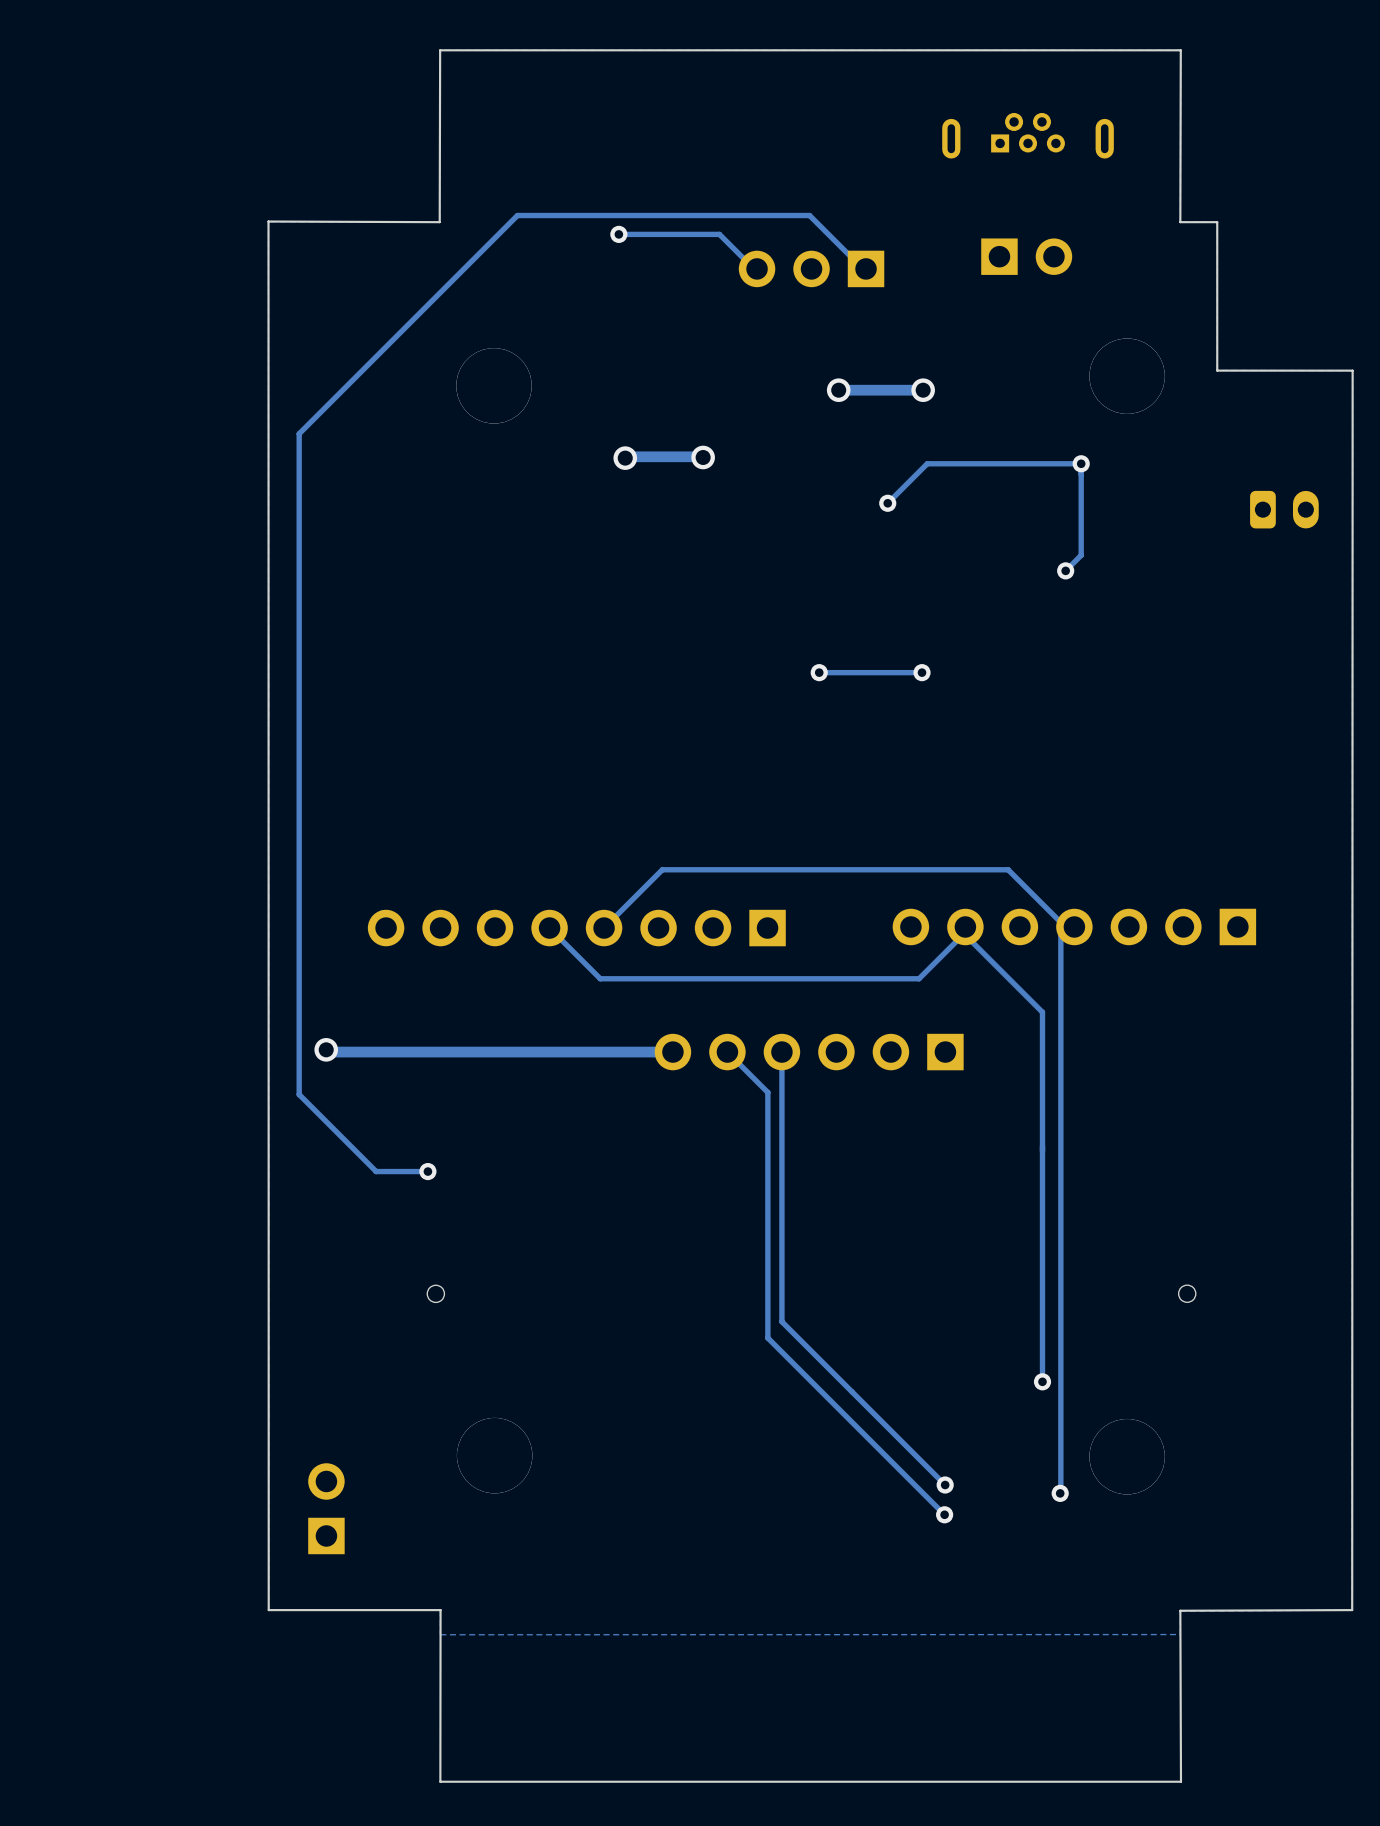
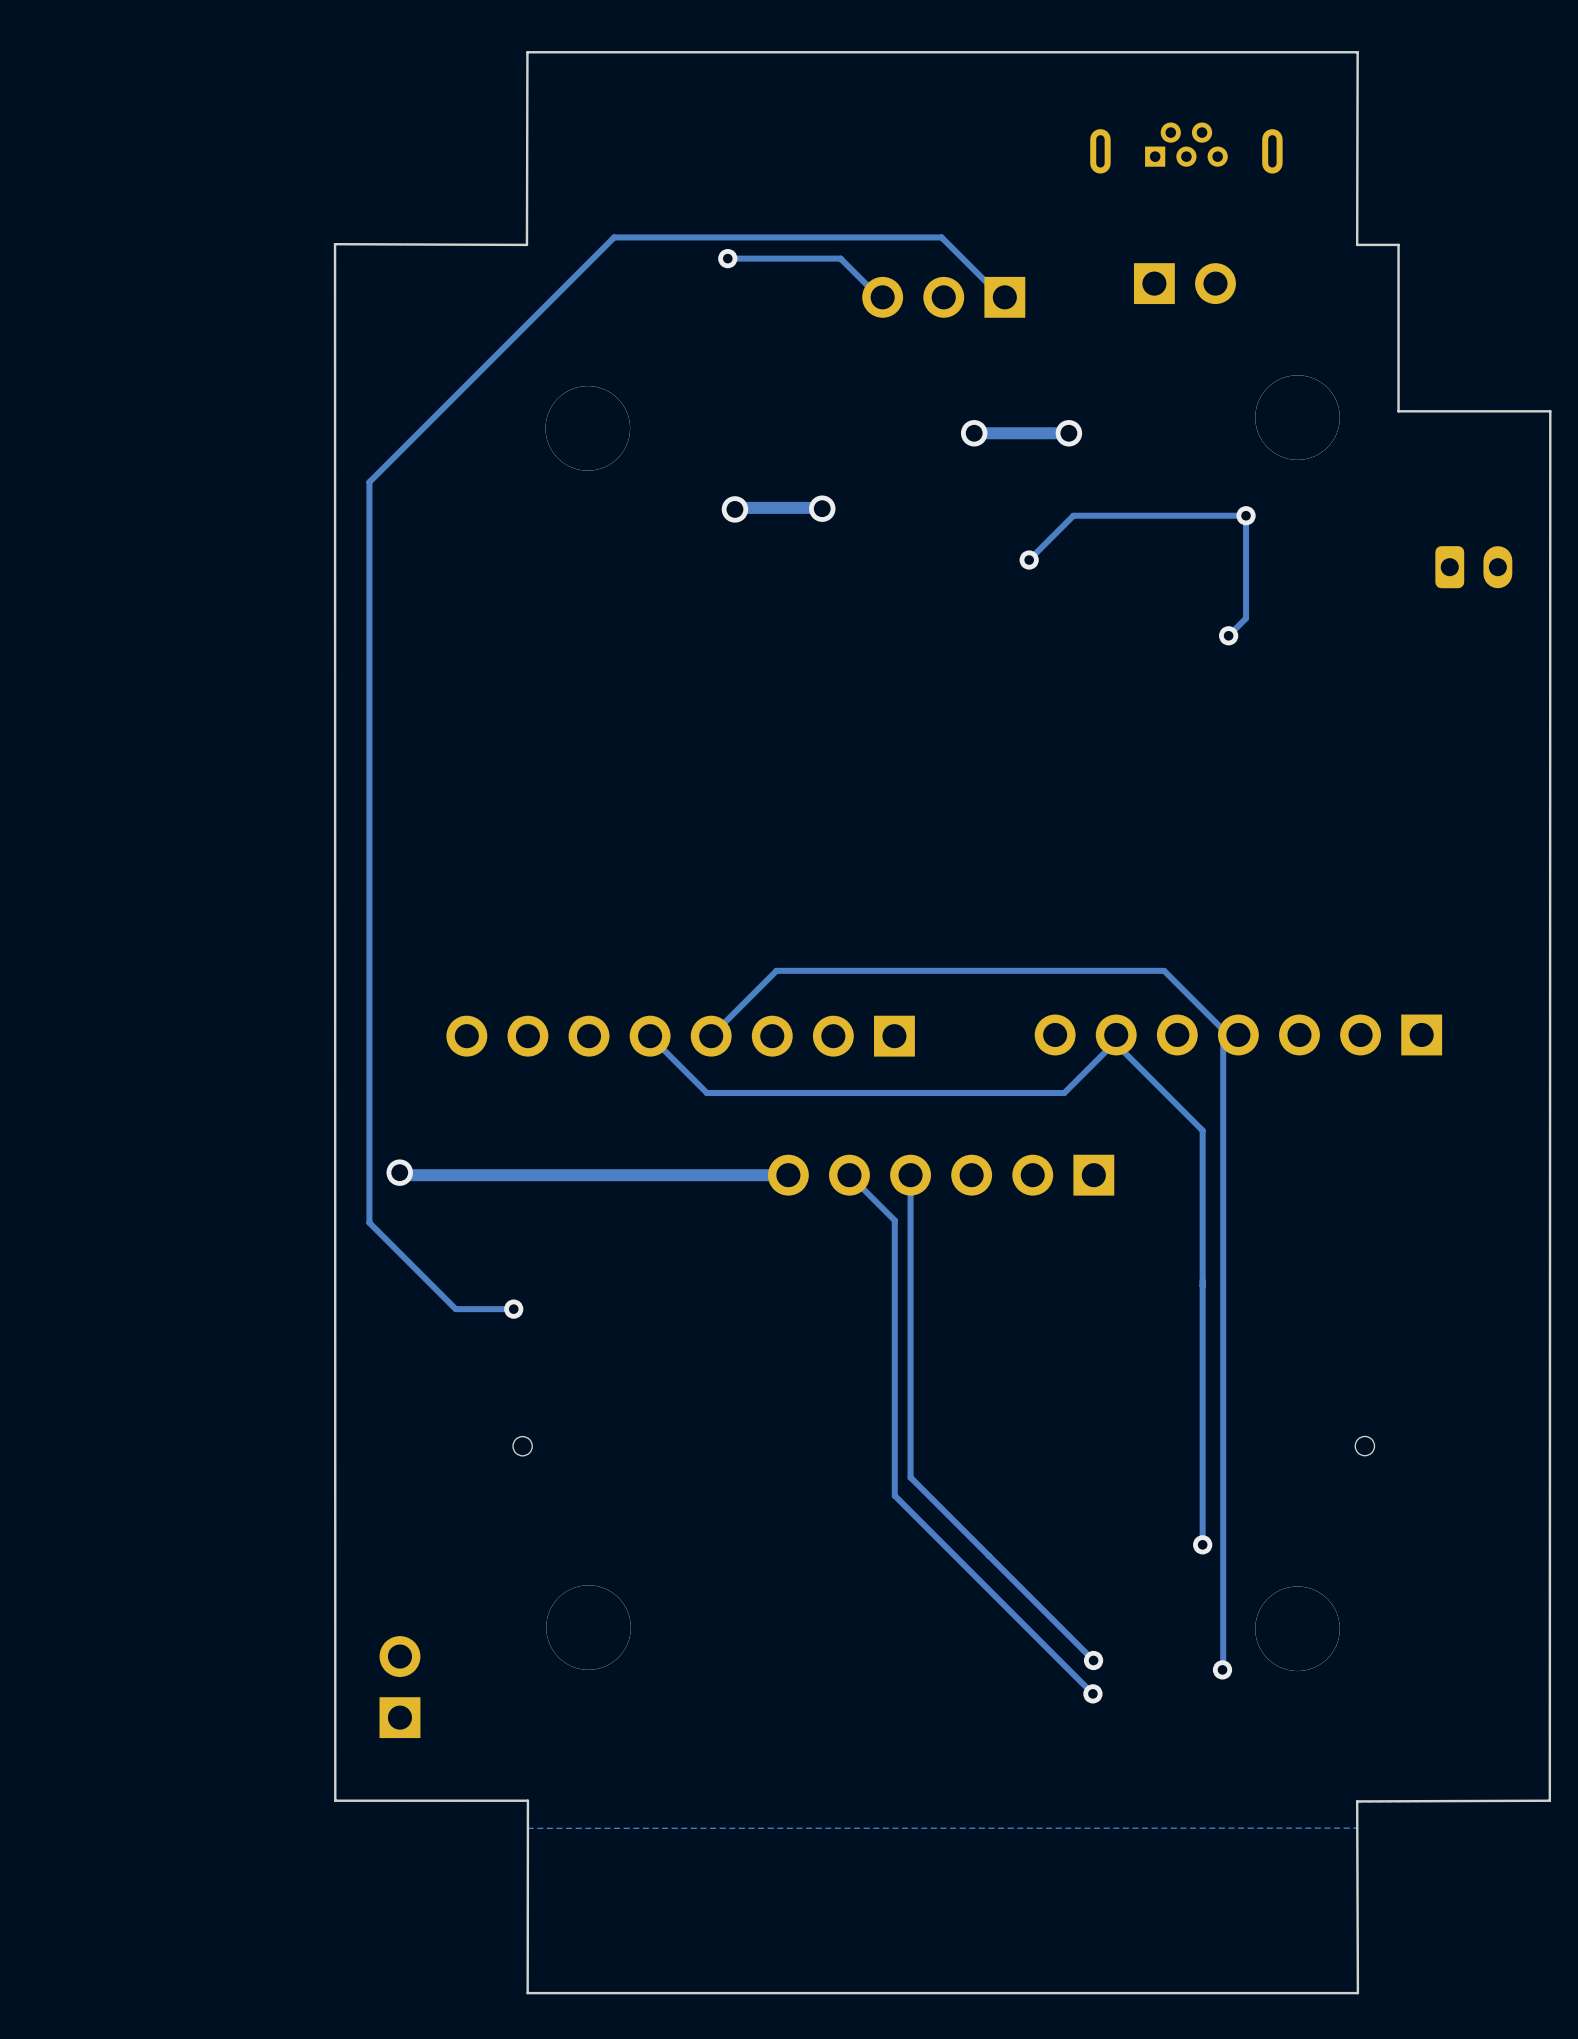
via: (819, 672) -> none
track: (914, 672) (819, 672) -> none
via: (922, 672) -> none

